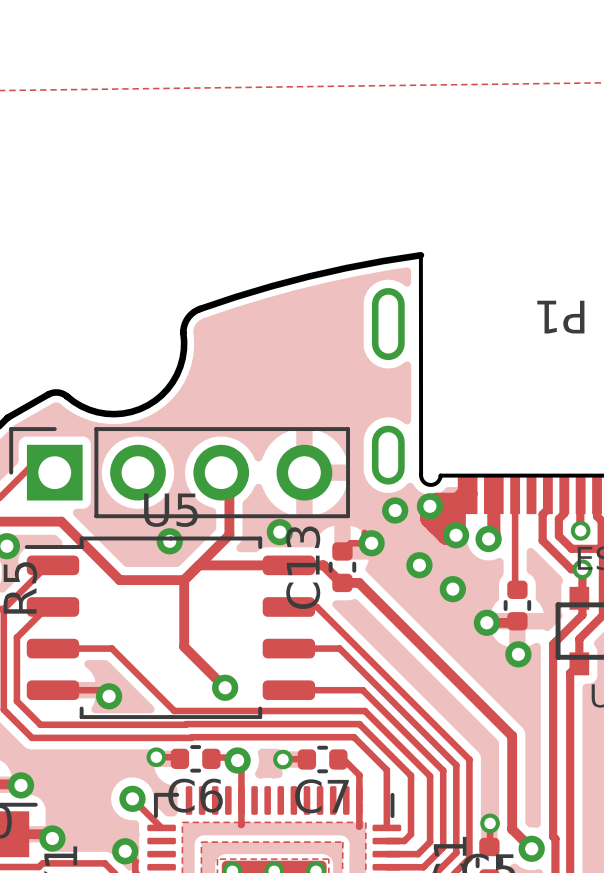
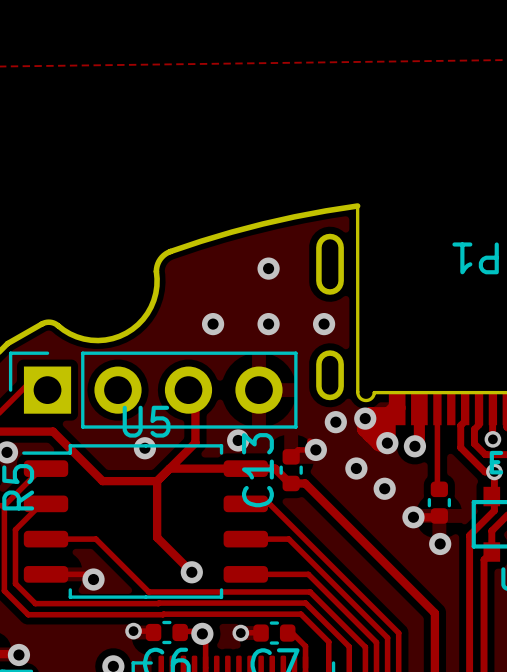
via: none -> (268, 268)
via: none -> (213, 324)
via: none -> (268, 324)
via: none -> (324, 324)

